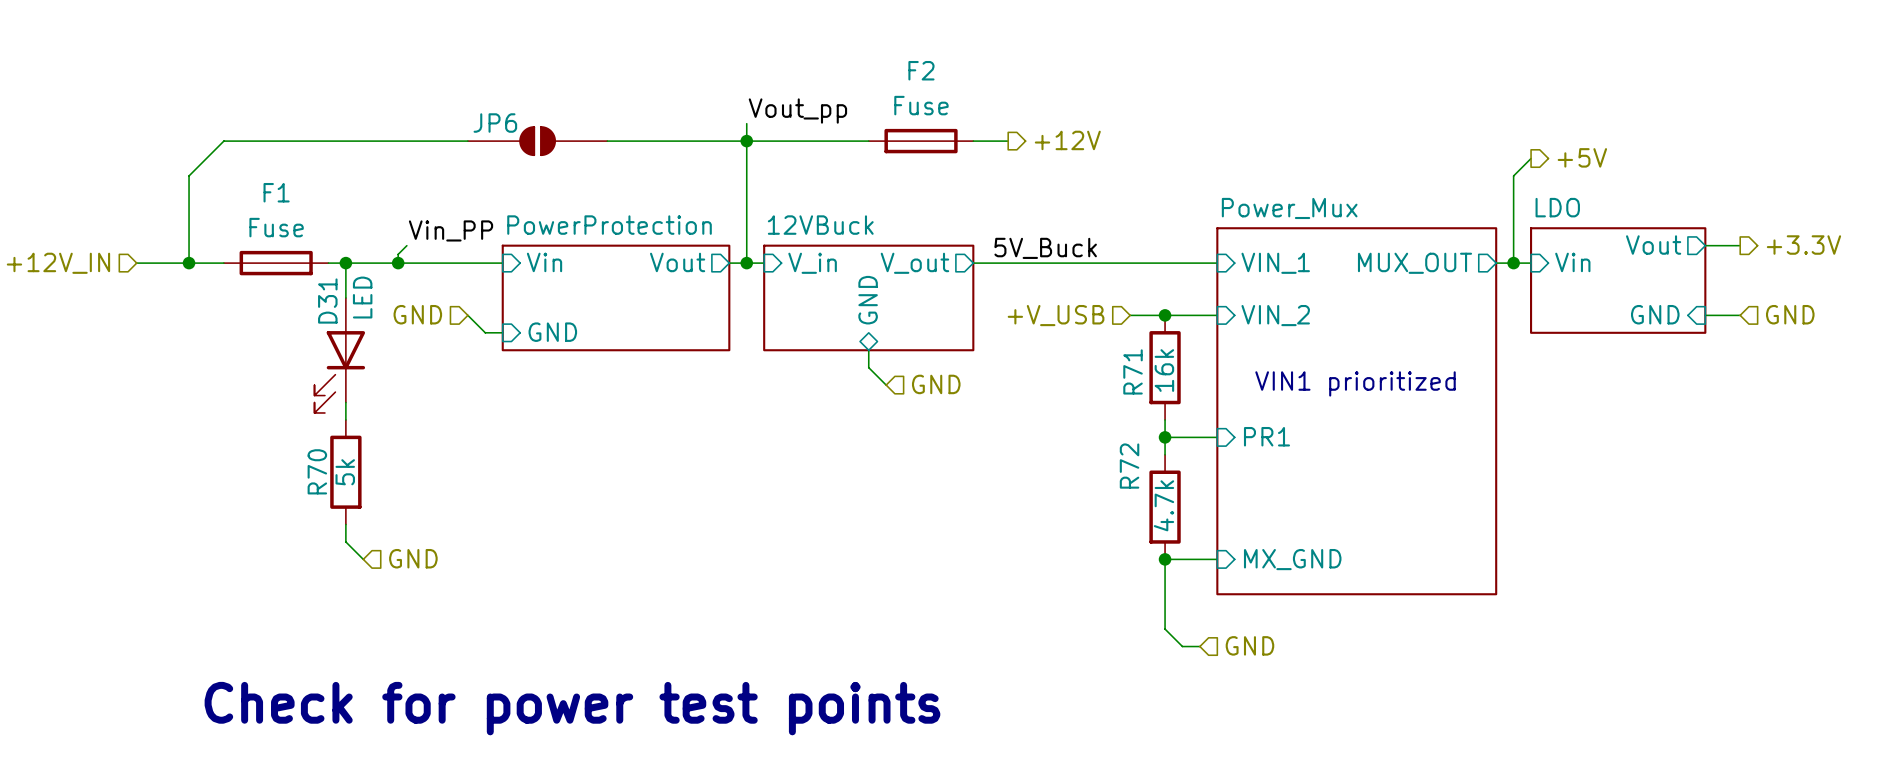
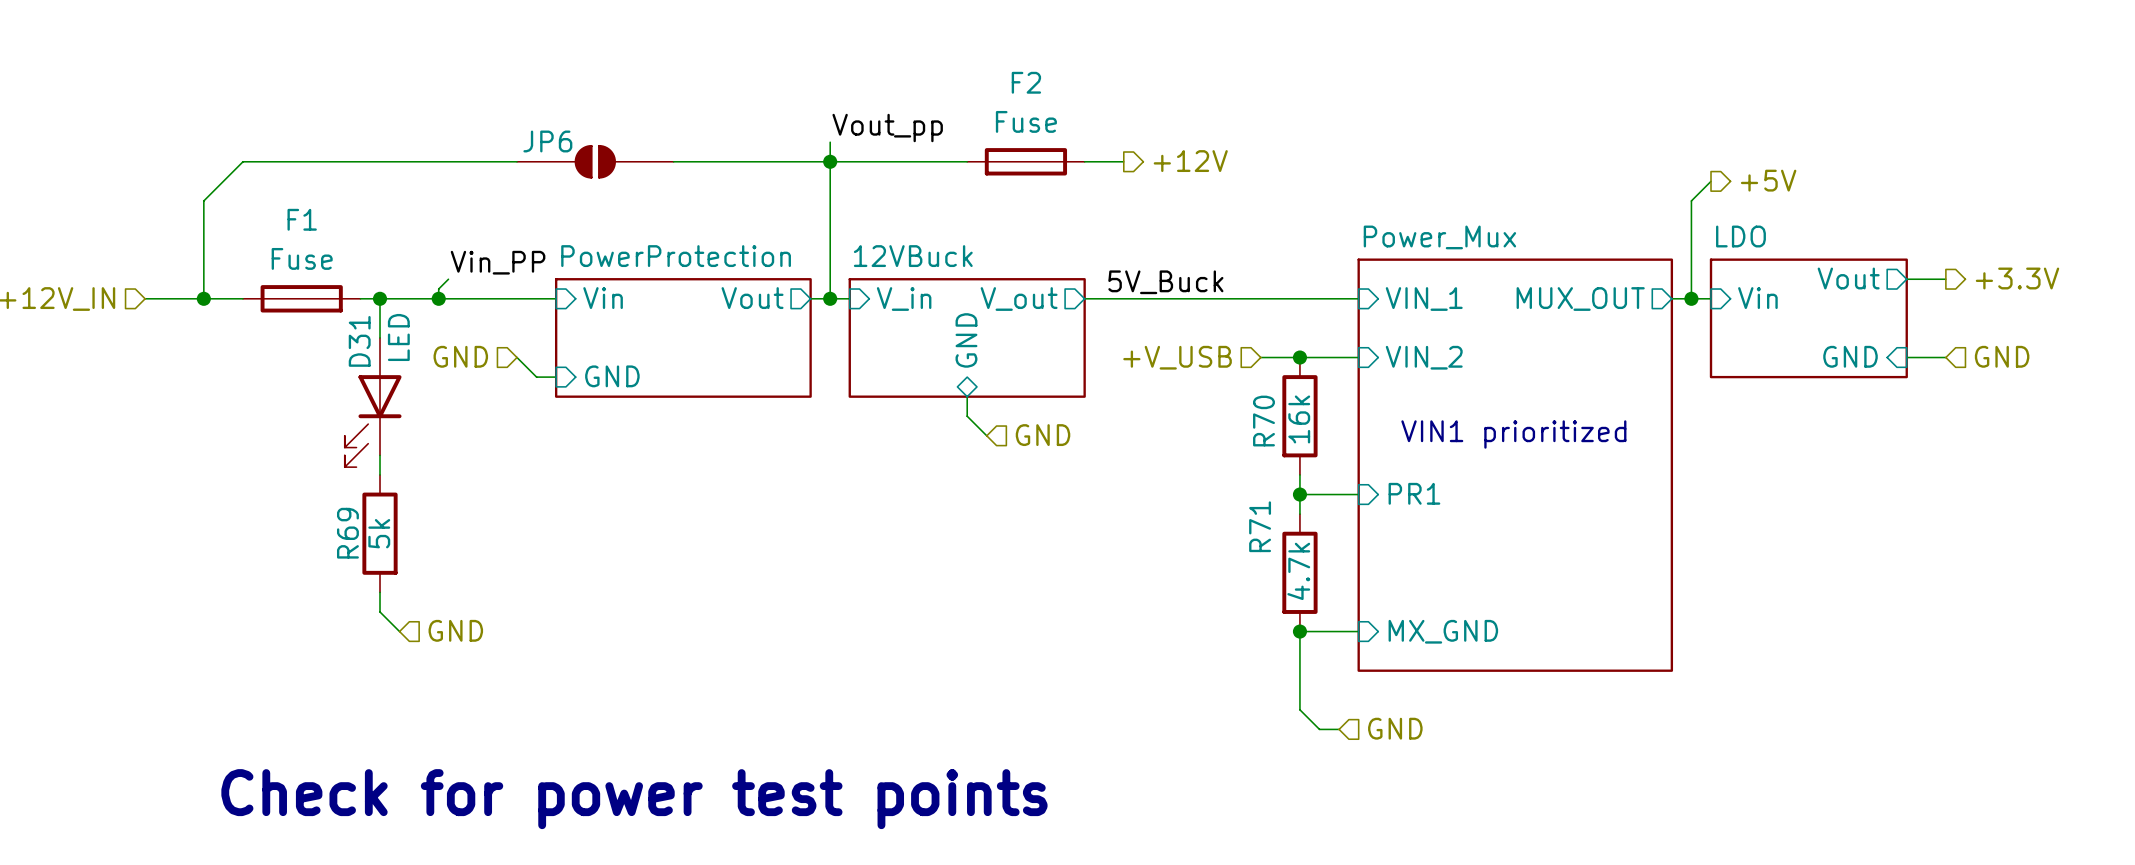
R71 name: R71 (1133, 371) -> R70 (1263, 421)
R72 name: R72 (1129, 466) -> R71 (1260, 526)
R70 name: R70 (317, 471) -> R69 (347, 533)

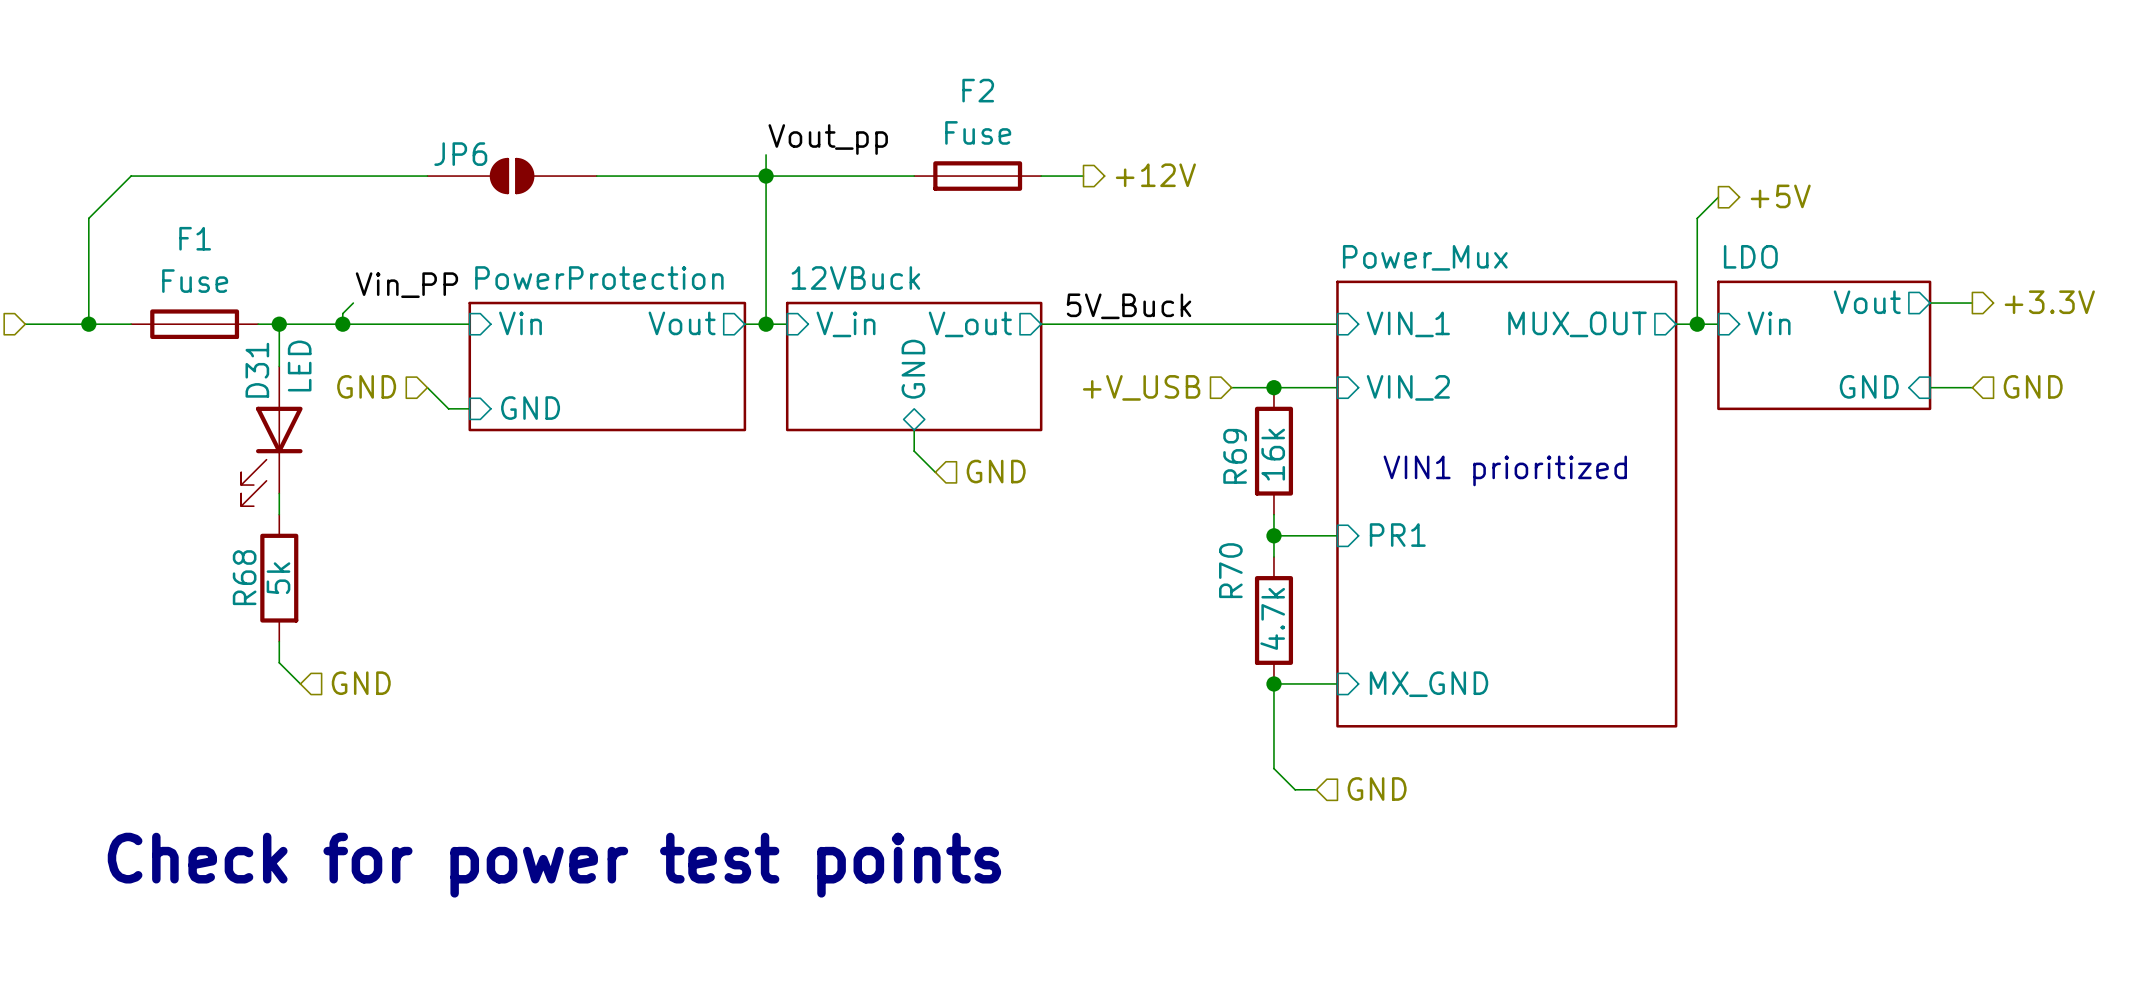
R70 name: R70 (1263, 421) -> R69 (1235, 456)
R71 name: R71 (1260, 526) -> R70 (1230, 570)
R69 name: R69 (347, 533) -> R68 (244, 577)

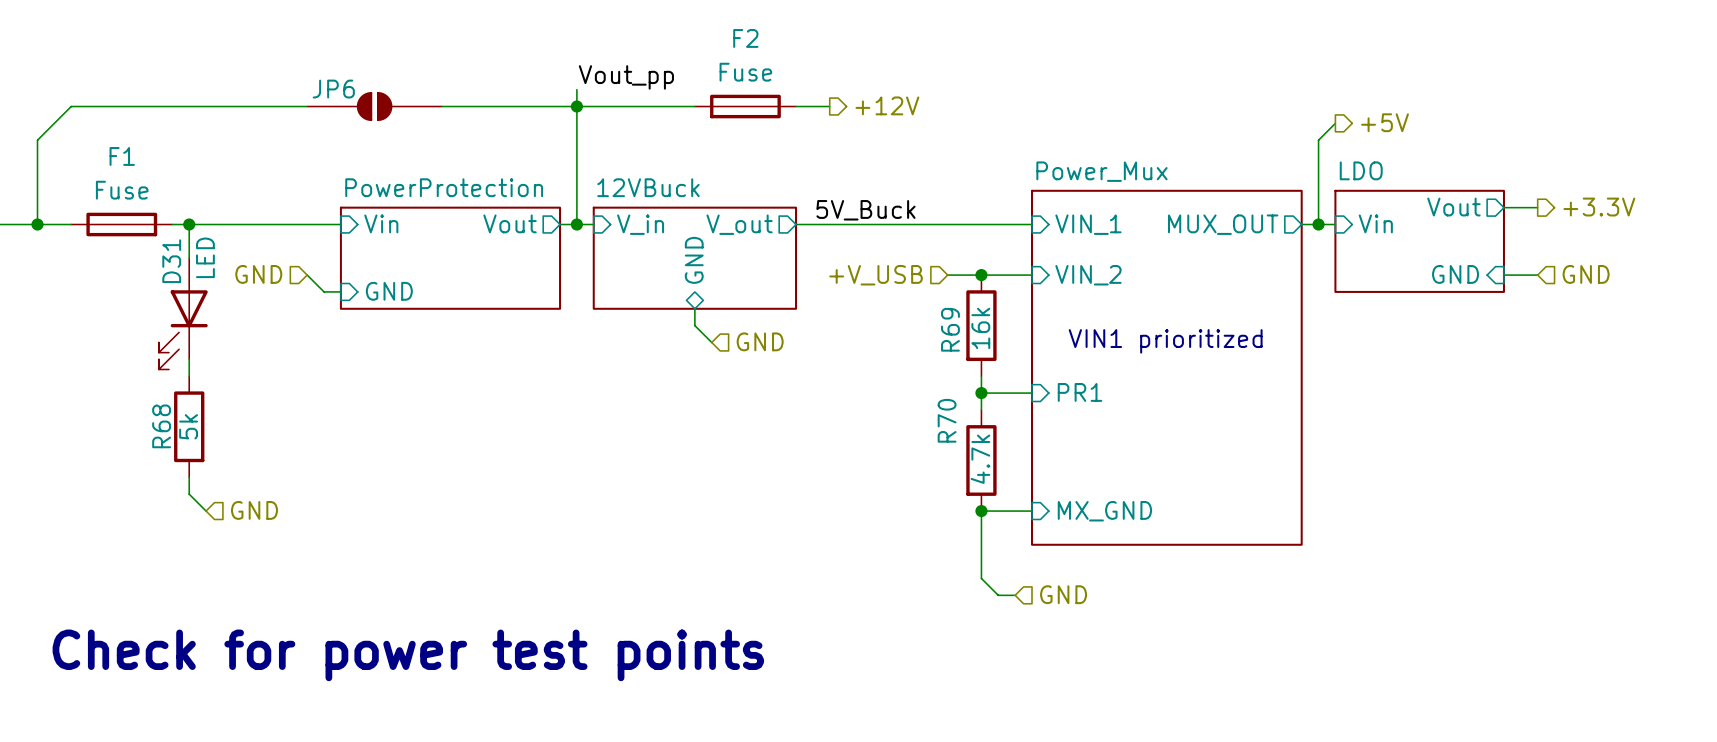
label: Vin_PP (406, 285) -> none
wire: (353, 303) (342, 313) (342, 324) -> none
junction: (342, 324) -> none

